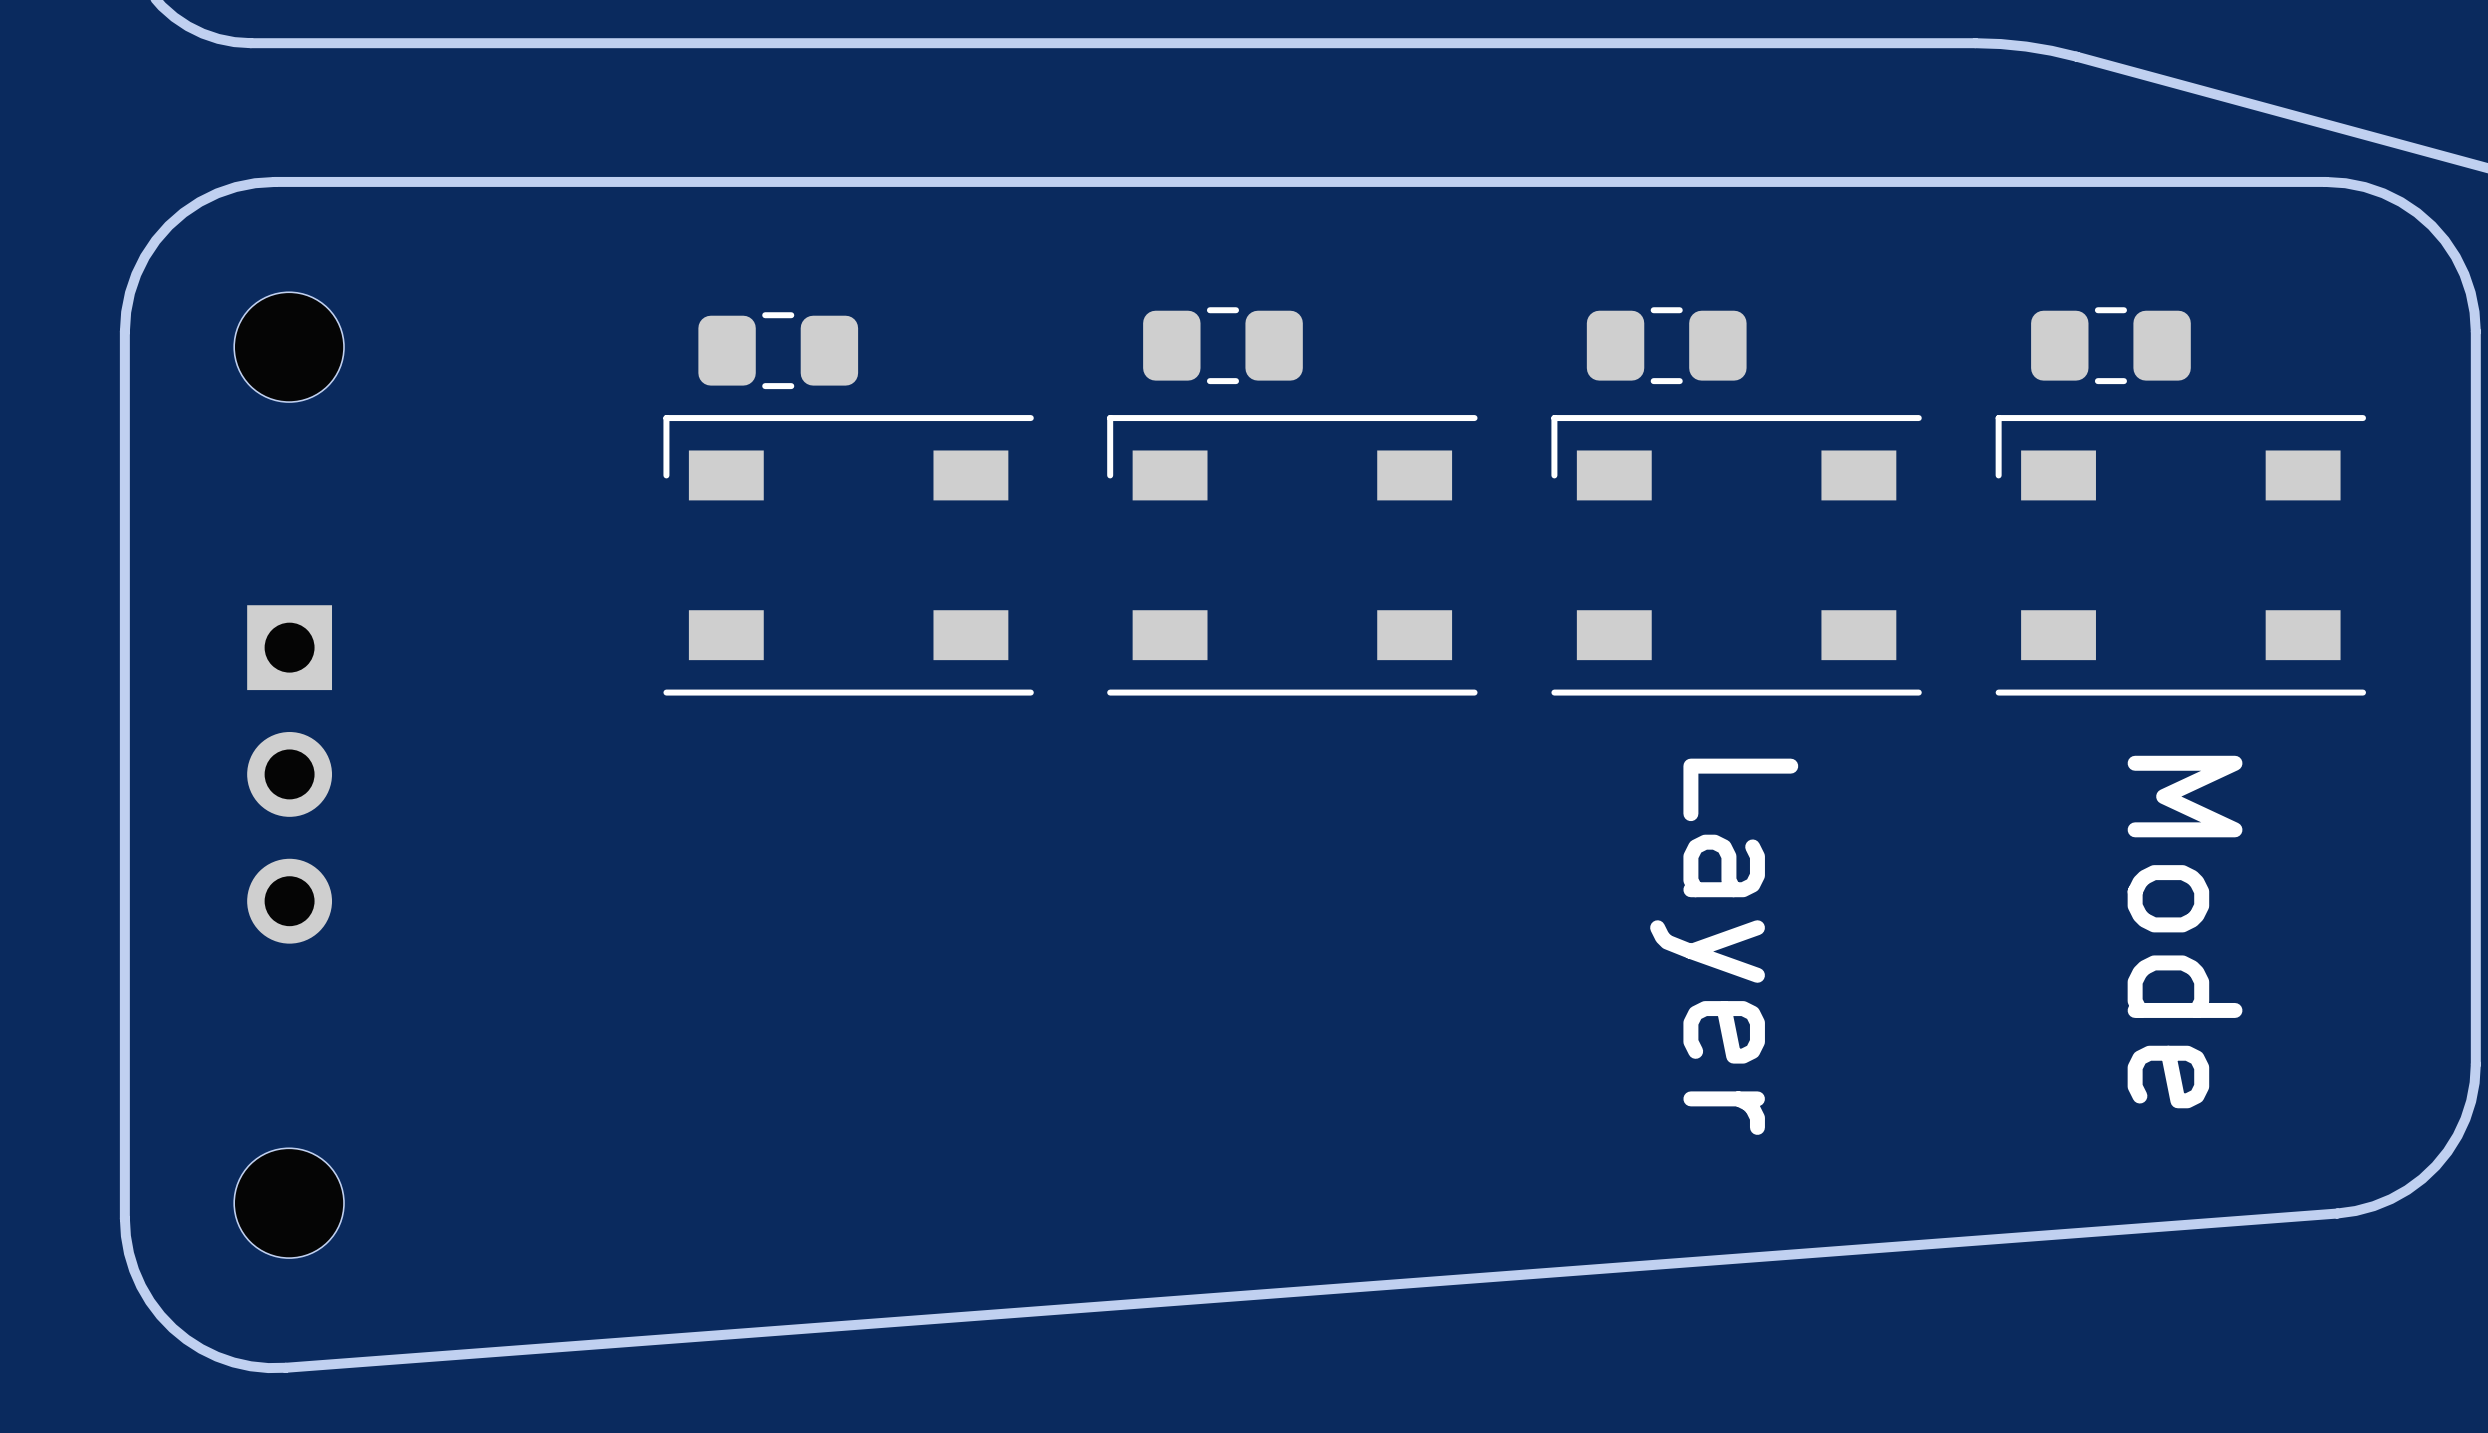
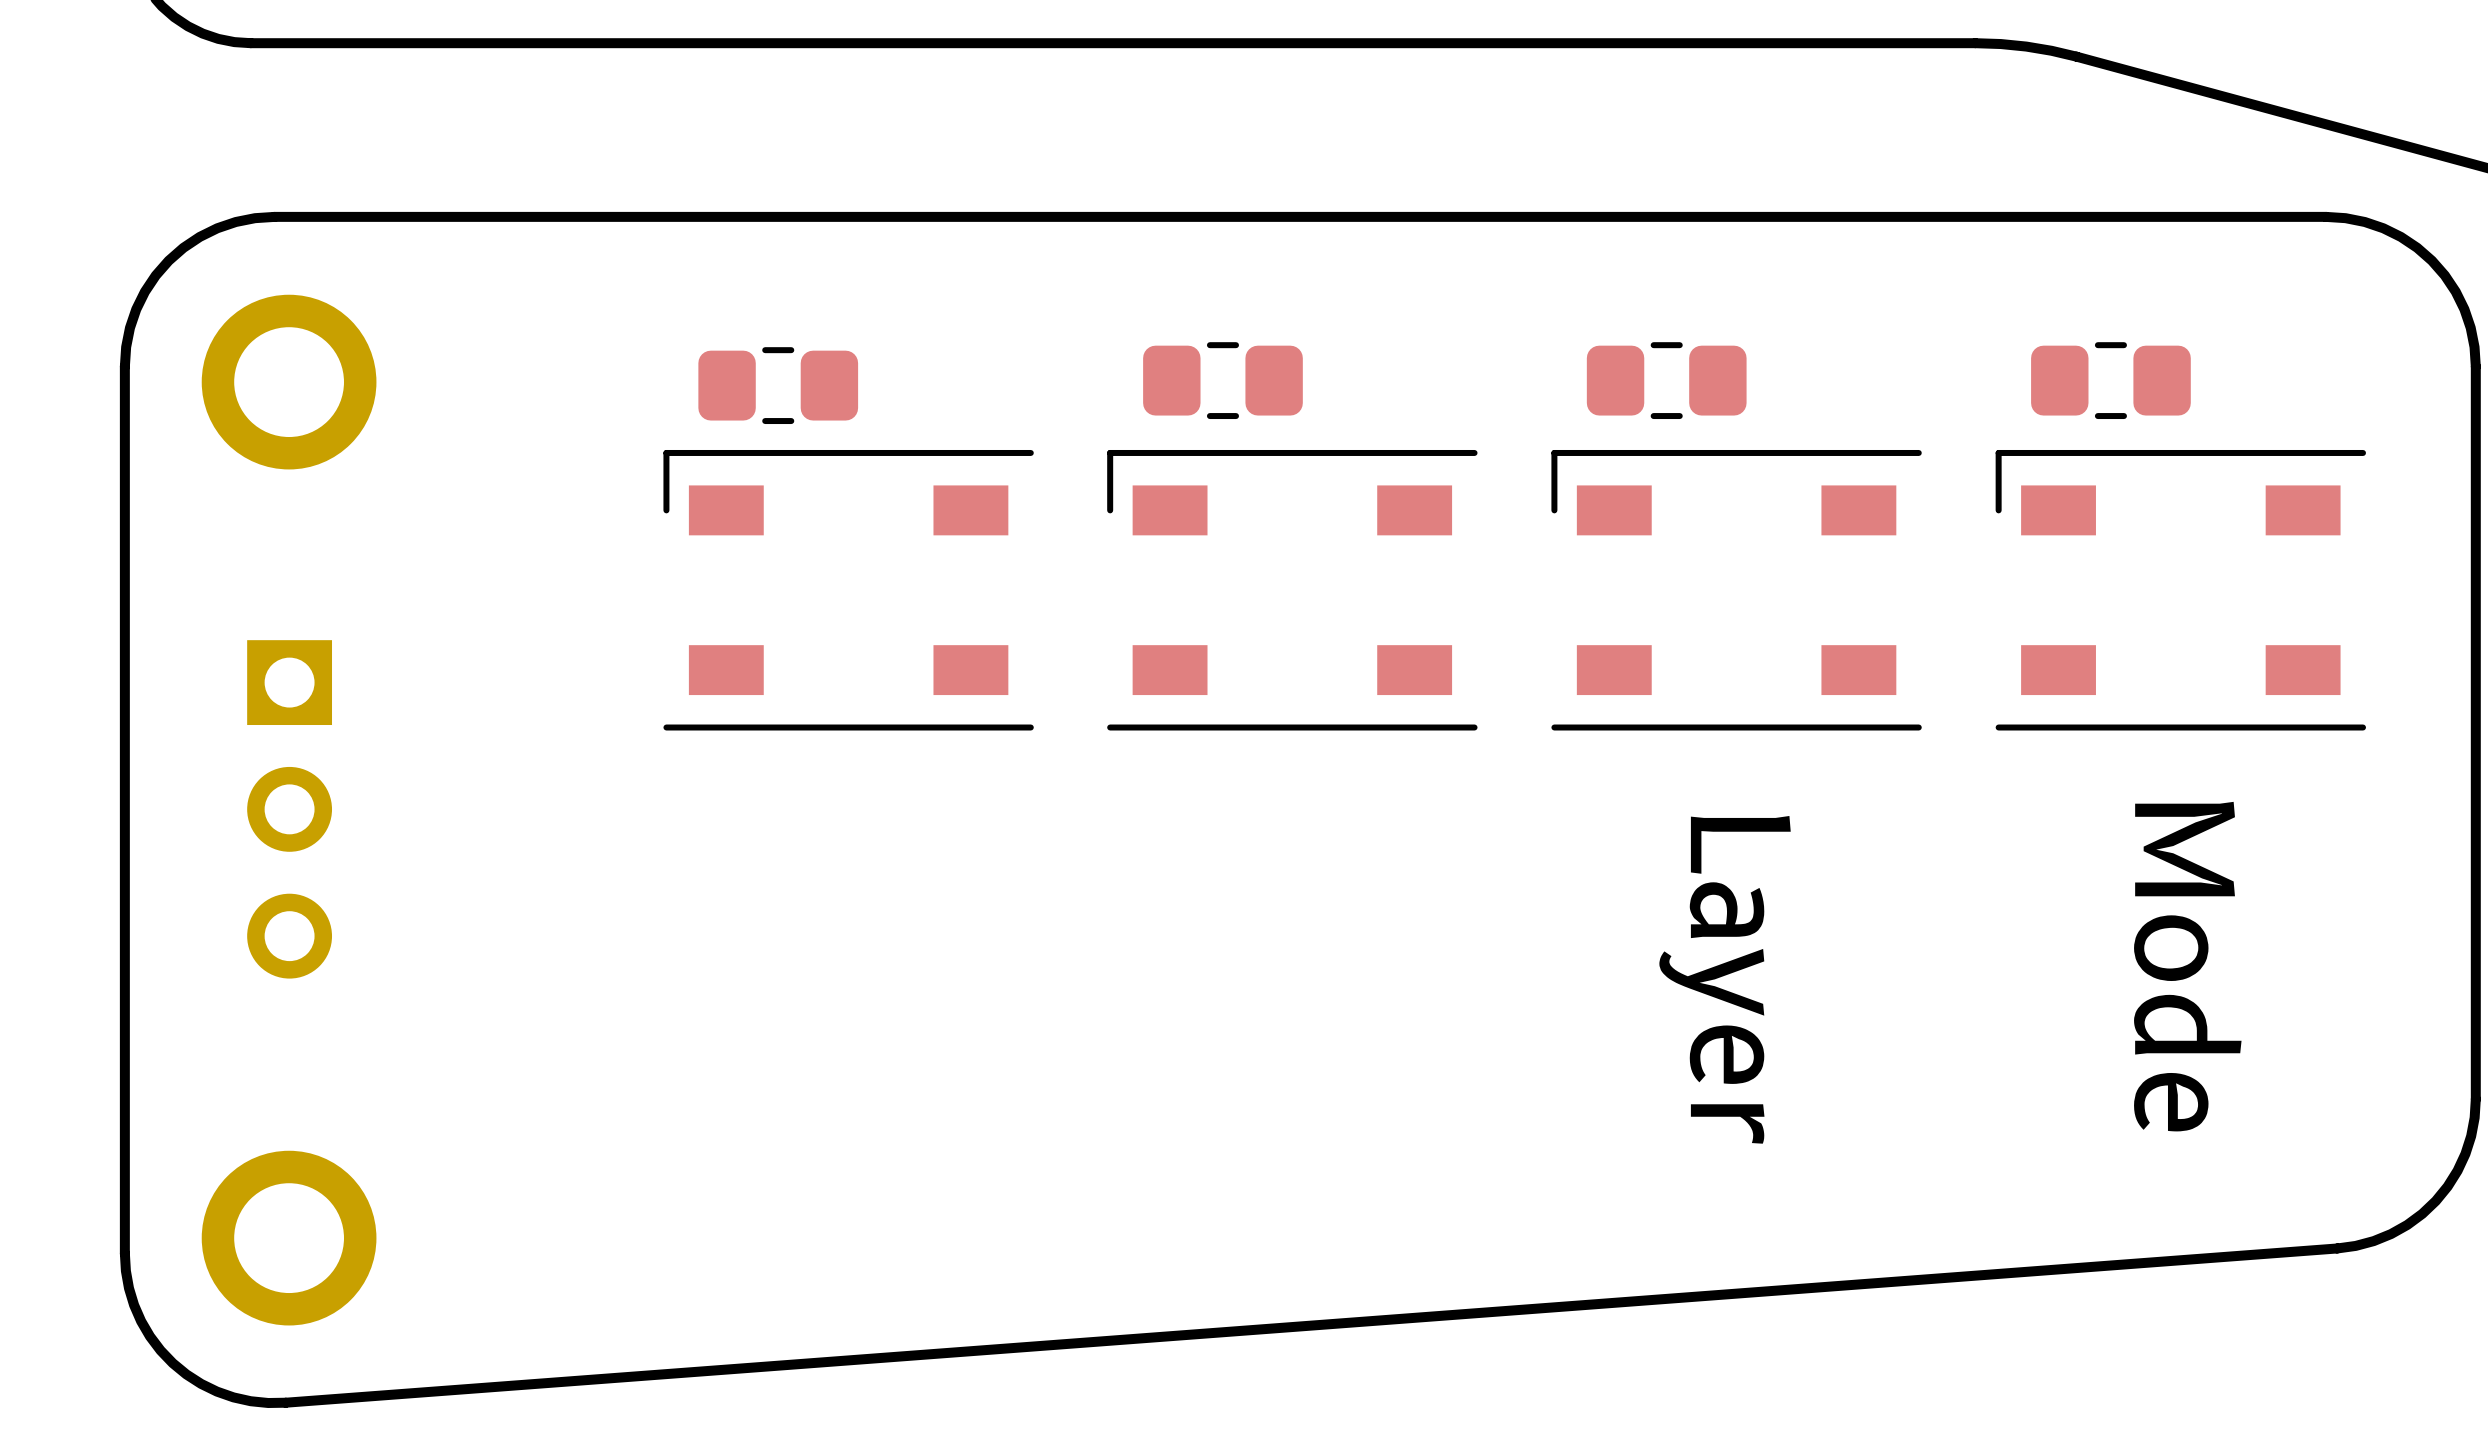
part footprint: [234, 292, 344, 403] -> [201, 294, 377, 470]
part position: (1222, 345) -> (1222, 380)
part position: (1666, 345) -> (1666, 380)
part position: (2110, 345) -> (2110, 380)
part position: (778, 350) -> (778, 385)
board edge: (124, 366) (126, 312) (129, 292) (144, 256) (155, 240) (183, 212) (217, 193) (235, 187) (274, 181) (2345, 183) (2364, 187) (2400, 202) (2417, 212) (2444, 240) (2455, 256) (2470, 292) (2474, 312) (2475, 366) -> (124, 366) (126, 347) (136, 309) (144, 291) (168, 260) (199, 236) (217, 228) (235, 221) (274, 216) (2345, 218) (2383, 228) (2400, 236) (2417, 247) (2444, 275) (2464, 309) (2474, 347) (2475, 366)
part position: (848, 555) -> (848, 590)
part position: (1292, 555) -> (1292, 590)
part position: (1736, 555) -> (1736, 590)
part position: (2180, 555) -> (2180, 590)
part position: (289, 774) -> (289, 809)
text position: Mode (2185, 932) -> Mode (2187, 966)
text position: Layer (1724, 946) -> Layer (1725, 979)
board edge: (2475, 1064) (2471, 1101) (2465, 1118) (2447, 1151) (2422, 1178) (2407, 1189) (2391, 1199) (2355, 1210) (285, 1367) (268, 1368) (233, 1362) (201, 1348) (172, 1328) (150, 1301) (141, 1286) (128, 1253) (124, 1218) -> (2475, 1064) (2474, 1117) (2471, 1136) (2465, 1153) (2447, 1186) (2435, 1200) (2407, 1224) (2391, 1234) (2355, 1245) (285, 1402) (250, 1401) (216, 1391) (186, 1374) (160, 1350) (141, 1321) (128, 1288) (125, 1270) (124, 1218)
part footprint: [234, 1148, 344, 1259] -> [201, 1150, 377, 1326]

